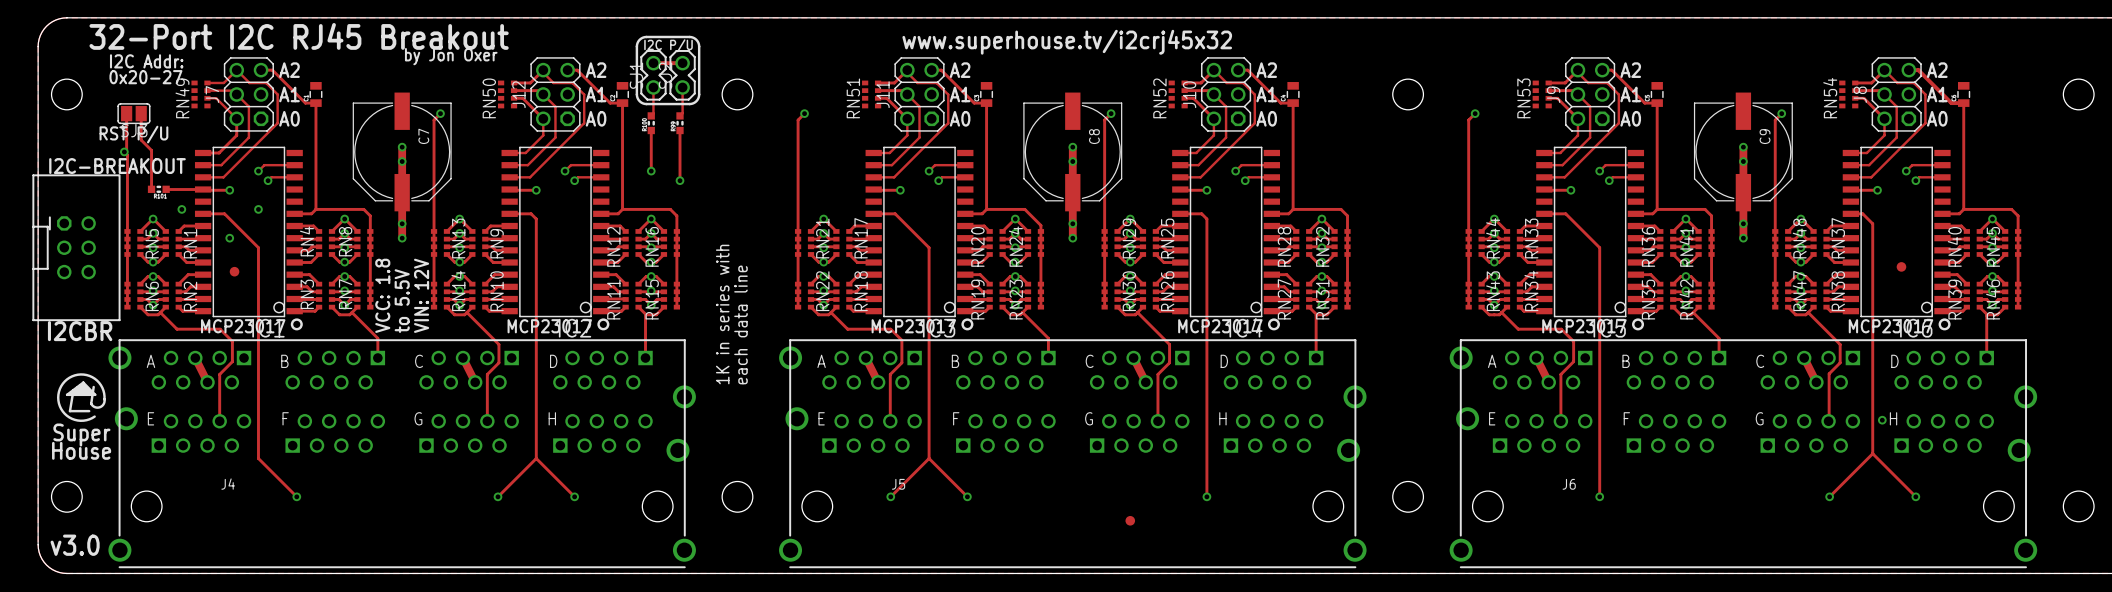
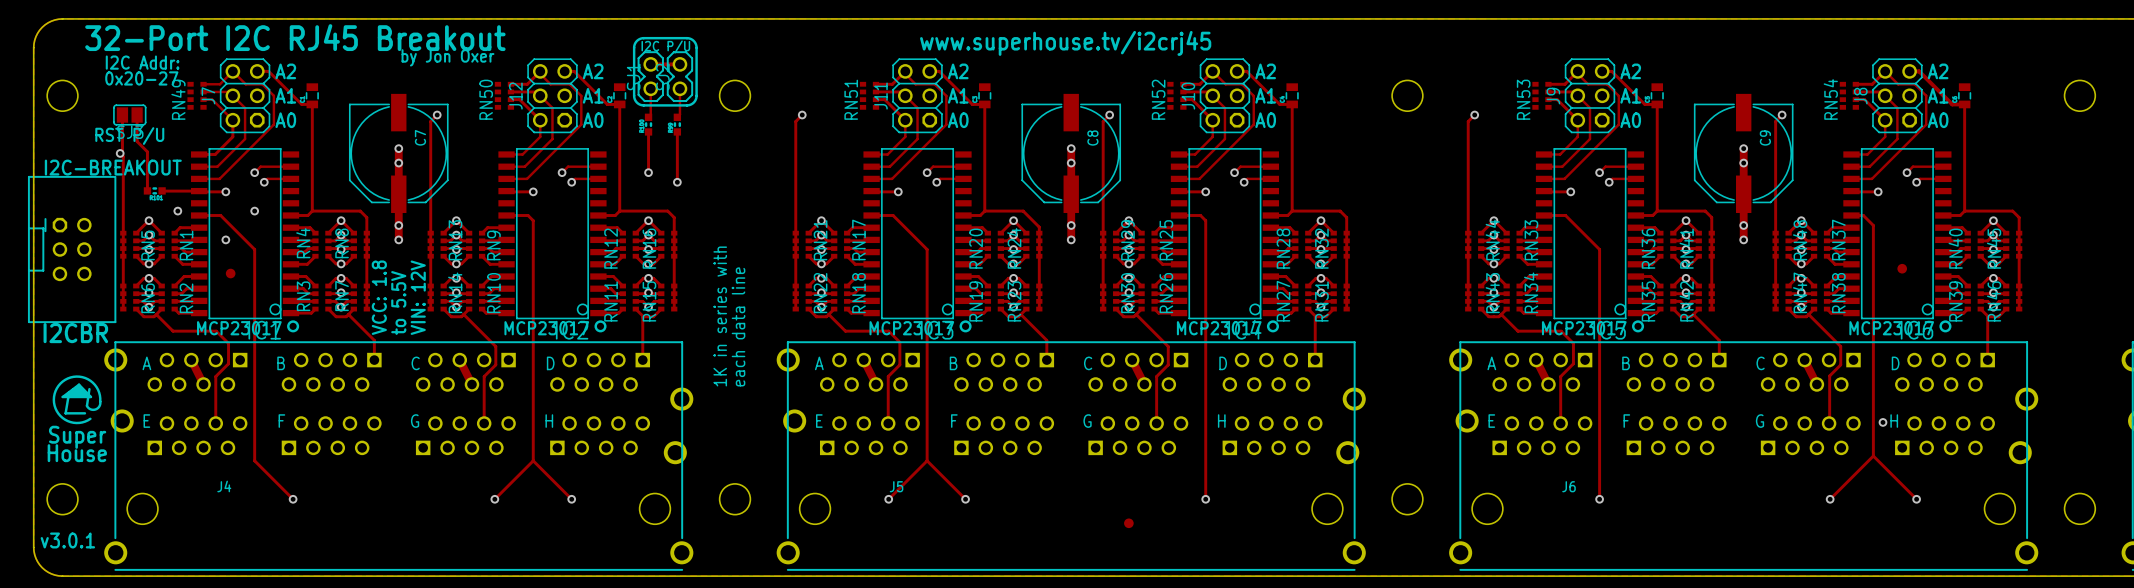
text: www.superhouse.tv/i2crj45x32 (1067, 42) -> www.superhouse.tv/i2crj45 (1065, 43)
text: v3.0 (75, 545) -> v3.0.1 (67, 540)

